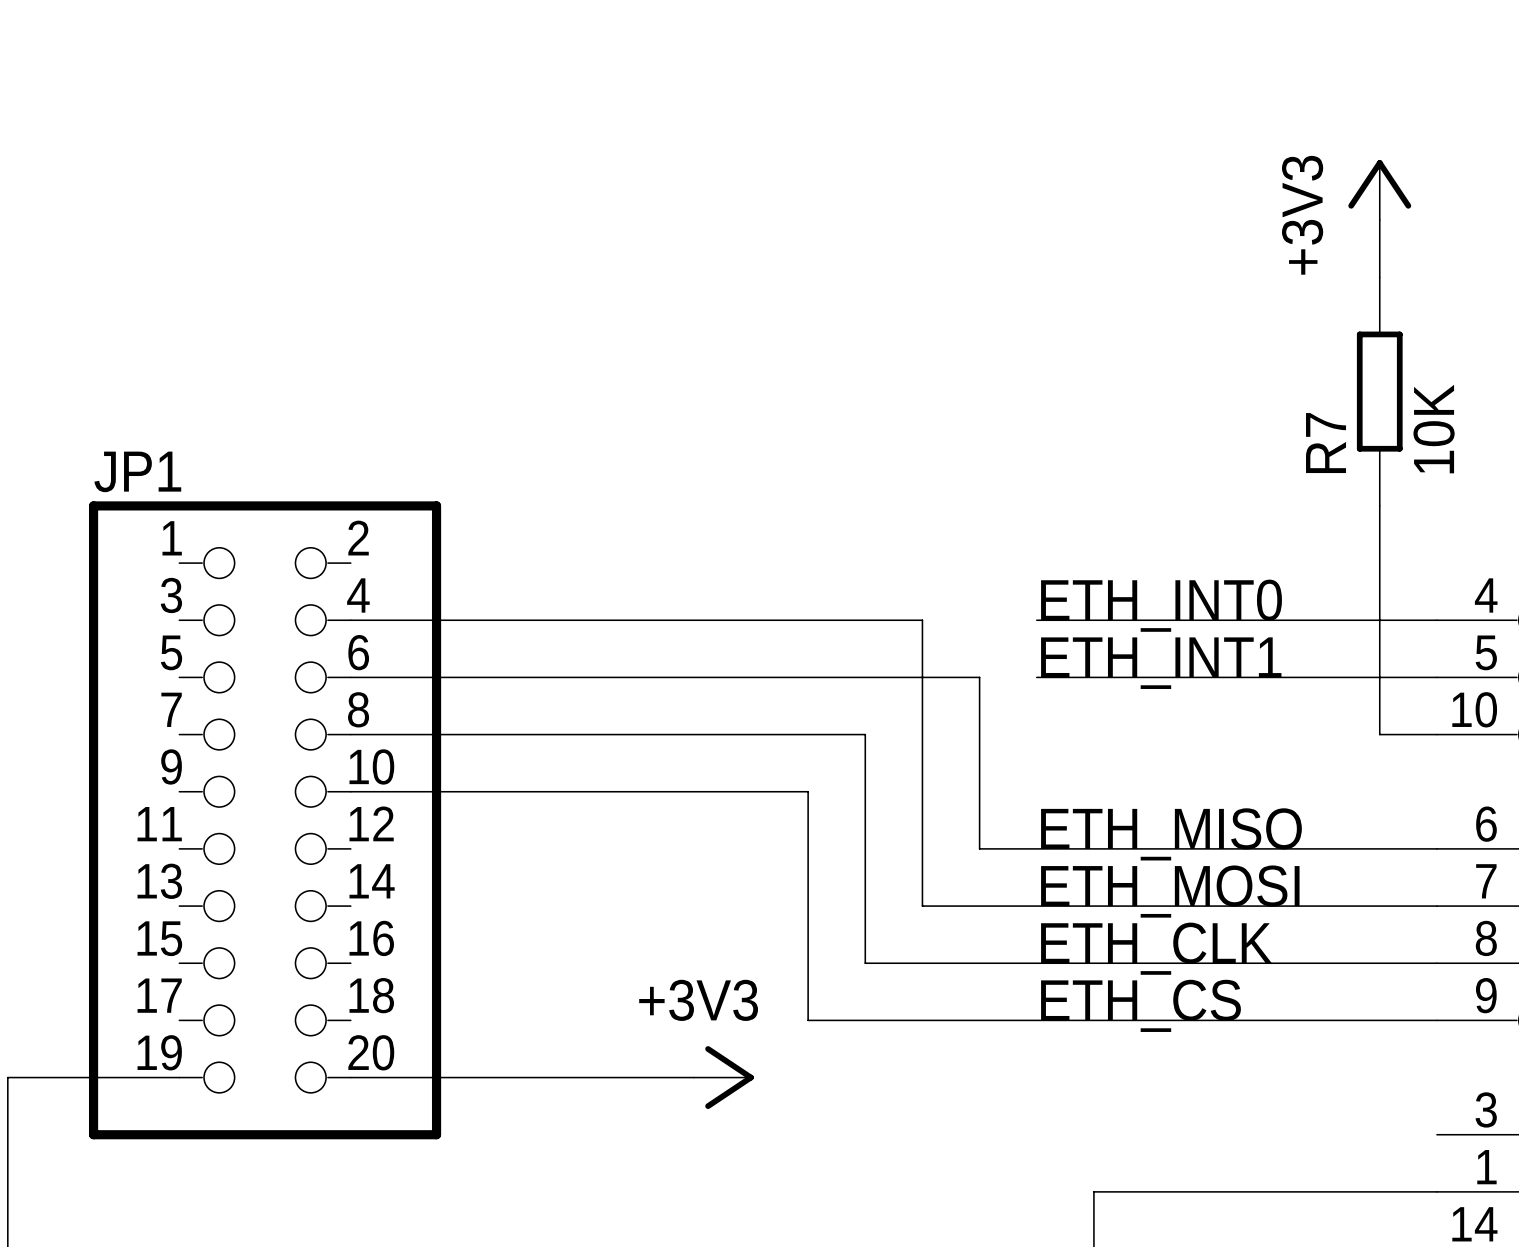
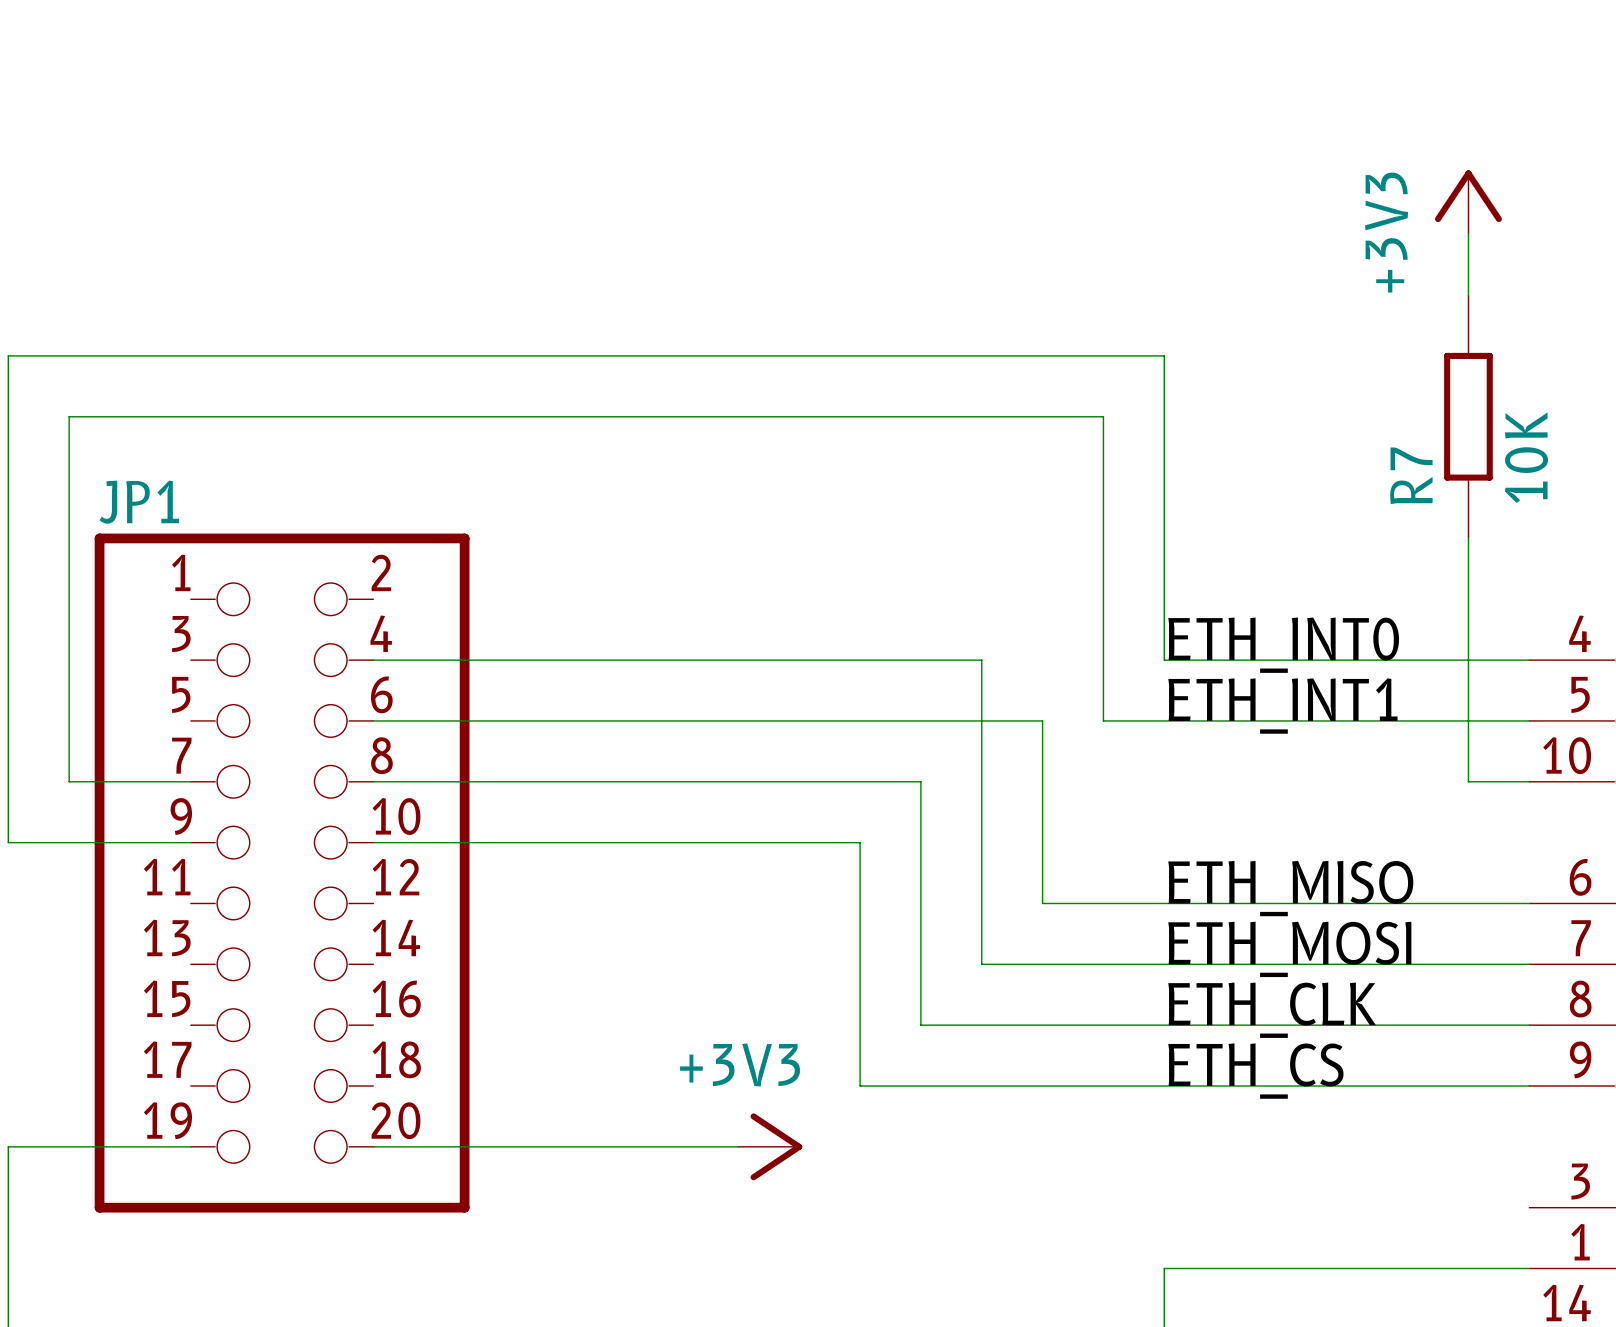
label position: ETH_INT0 (1161, 605) -> ETH_INT0 (1283, 645)
wire: (1036, 620) (1093, 620) -> (190, 842) (8, 842) (8, 355) (1164, 355) (1164, 660)
label position: ETH_INT1 (1161, 663) -> ETH_INT1 (1282, 706)
wire: none -> (1103, 720) (1103, 416) (69, 416) (69, 781) (190, 781)
label position: ETH_MISO (1171, 834) -> ETH_MISO (1290, 888)
label position: ETH_MOSI (1170, 891) -> ETH_MOSI (1289, 949)
label position: ETH_CLK (1156, 948) -> ETH_CLK (1272, 1010)
label position: ETH_CS (1140, 1005) -> ETH_CS (1255, 1071)

